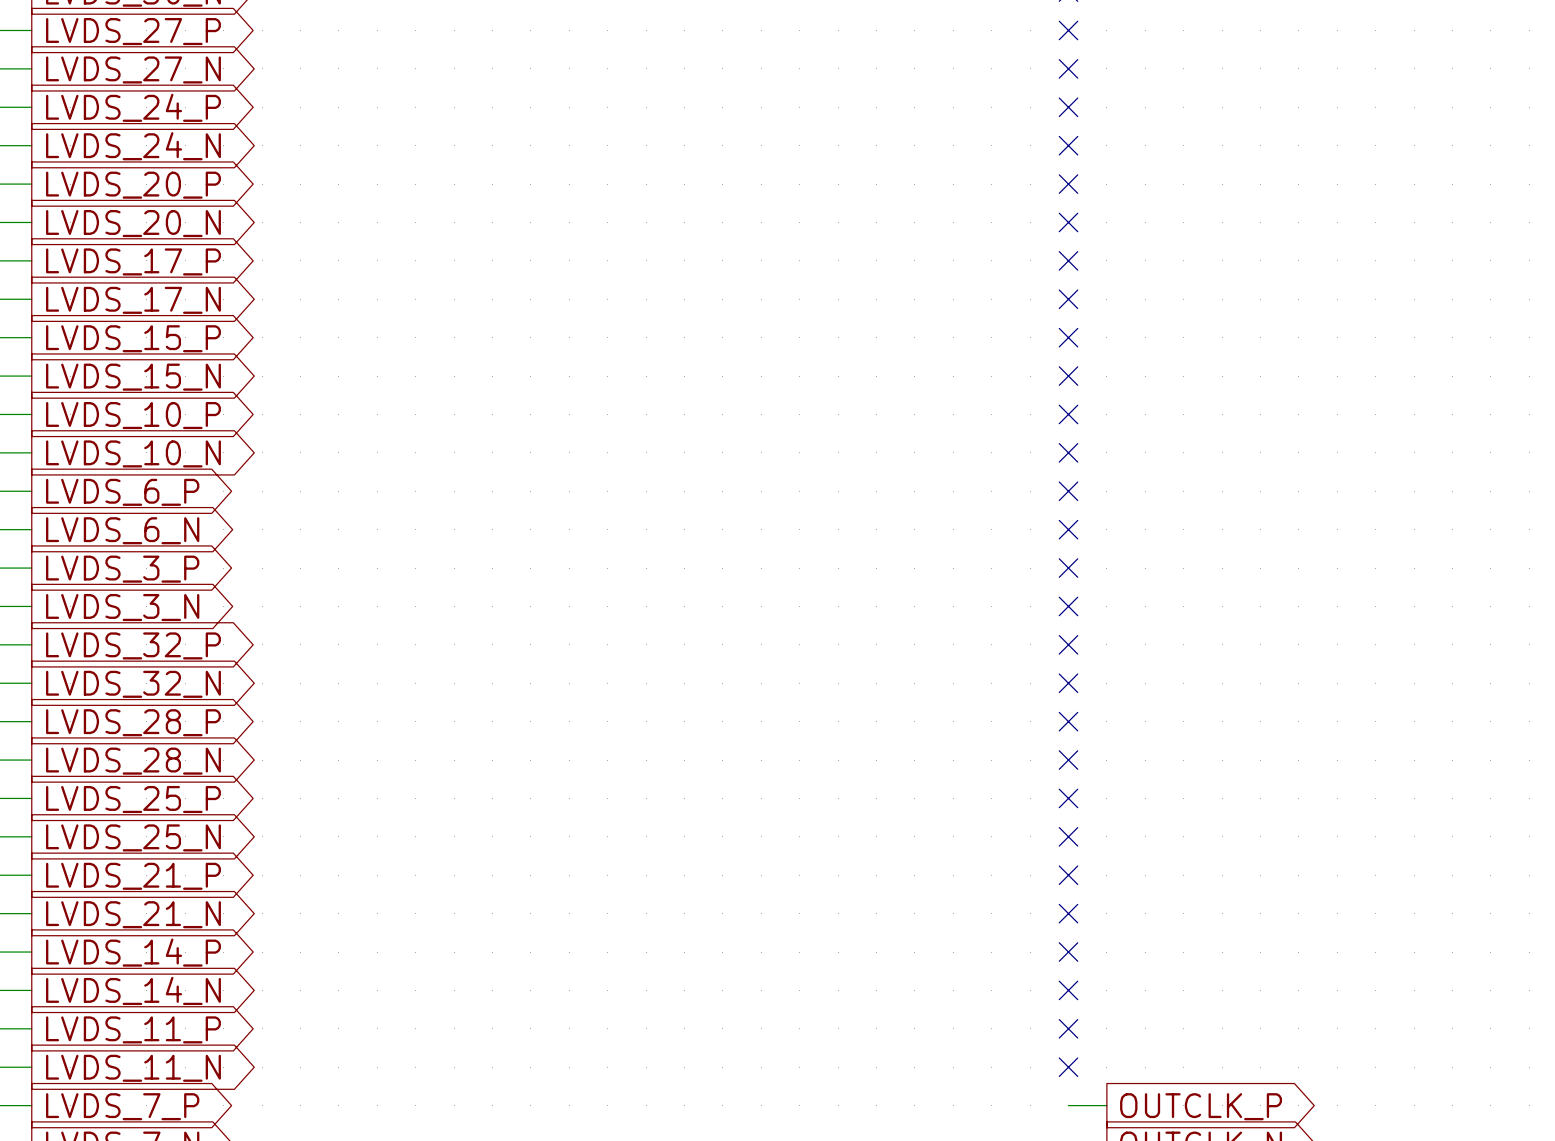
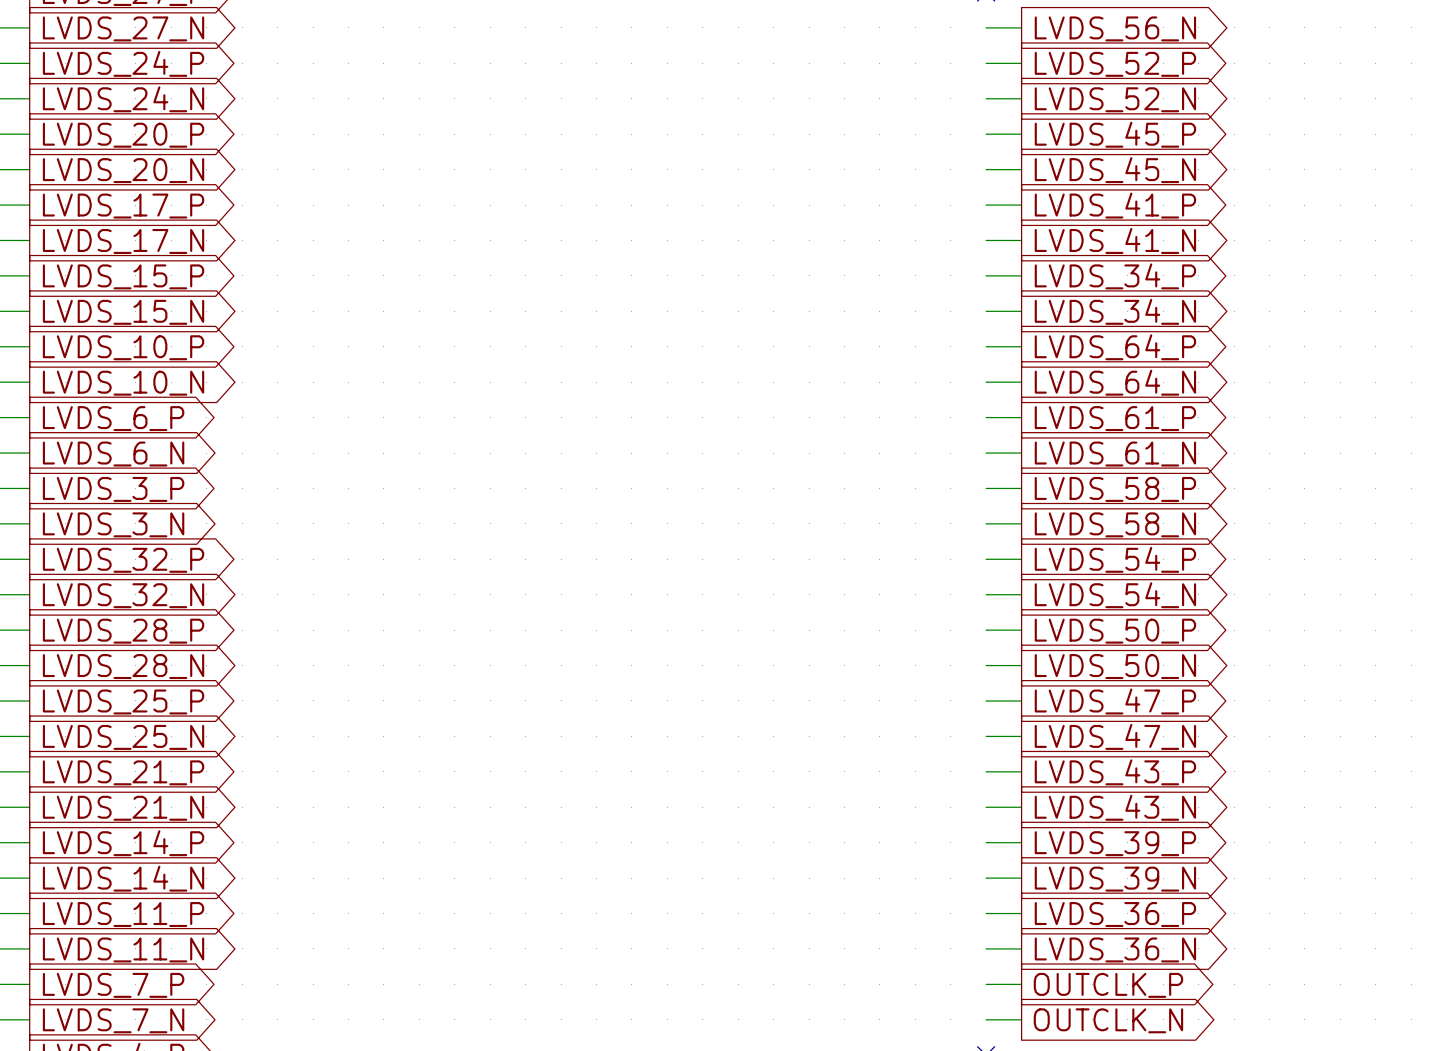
wire: none -> (986, 27) (1021, 27)
no-connect mark: (1068, 68) -> none
global label: none -> LVDS_56_N (1115, 28)
wire: none -> (986, 63) (1021, 63)
no-connect mark: (1068, 107) -> none
global label: none -> LVDS_52_P (1115, 64)
wire: none -> (986, 98) (1021, 98)
no-connect mark: (1068, 145) -> none
global label: none -> LVDS_52_N (1115, 99)
wire: none -> (986, 134) (1021, 134)
no-connect mark: (1068, 184) -> none
global label: none -> LVDS_45_P (1115, 134)
wire: none -> (986, 169) (1021, 169)
no-connect mark: (1068, 222) -> none
global label: none -> LVDS_45_N (1115, 170)
wire: none -> (986, 205) (1021, 205)
no-connect mark: (1068, 260) -> none
global label: none -> LVDS_41_P (1115, 205)
wire: none -> (986, 240) (1021, 240)
no-connect mark: (1068, 299) -> none
global label: none -> LVDS_41_N (1115, 240)
wire: none -> (986, 275) (1021, 275)
no-connect mark: (1068, 337) -> none
global label: none -> LVDS_34_P (1115, 276)
wire: none -> (986, 311) (1021, 311)
no-connect mark: (1068, 376) -> none
global label: none -> LVDS_34_N (1115, 311)
wire: none -> (986, 346) (1021, 346)
no-connect mark: (1068, 414) -> none
global label: none -> LVDS_64_P (1115, 347)
wire: none -> (986, 382) (1021, 382)
no-connect mark: (1068, 452) -> none
global label: none -> LVDS_64_N (1115, 382)
wire: none -> (986, 417) (1021, 417)
no-connect mark: (1068, 491) -> none
global label: none -> LVDS_61_P (1115, 418)
wire: none -> (986, 453) (1021, 453)
no-connect mark: (1068, 529) -> none
global label: none -> LVDS_61_N (1115, 454)
wire: none -> (986, 488) (1021, 488)
no-connect mark: (1068, 568) -> none
global label: none -> LVDS_58_P (1115, 489)
wire: none -> (986, 523) (1021, 523)
no-connect mark: (1068, 606) -> none
global label: none -> LVDS_58_N (1115, 524)
wire: none -> (986, 559) (1021, 559)
no-connect mark: (1068, 644) -> none
global label: none -> LVDS_54_P (1115, 559)
wire: none -> (986, 594) (1021, 594)
no-connect mark: (1068, 683) -> none
global label: none -> LVDS_54_N (1115, 595)
wire: none -> (986, 630) (1021, 630)
no-connect mark: (1068, 721) -> none
global label: none -> LVDS_50_P (1115, 631)
wire: none -> (986, 665) (1021, 665)
no-connect mark: (1068, 760) -> none
global label: none -> LVDS_50_N (1115, 666)
wire: none -> (986, 700) (1021, 700)
no-connect mark: (1068, 798) -> none
global label: none -> LVDS_47_P (1115, 701)
wire: none -> (986, 736) (1021, 736)
no-connect mark: (1068, 836) -> none
global label: none -> LVDS_47_N (1115, 736)
wire: none -> (986, 771) (1021, 771)
no-connect mark: (1068, 875) -> none
global label: none -> LVDS_43_P (1115, 772)
wire: none -> (986, 807) (1021, 807)
no-connect mark: (1068, 913) -> none
global label: none -> LVDS_43_N (1115, 807)
wire: none -> (986, 842) (1021, 842)
no-connect mark: (1068, 952) -> none
global label: none -> LVDS_39_P (1115, 843)
wire: none -> (986, 878) (1021, 878)
no-connect mark: (1068, 990) -> none
global label: none -> LVDS_39_N (1115, 879)
wire: none -> (986, 913) (1021, 913)
no-connect mark: (1068, 1028) -> none
global label: none -> LVDS_36_P (1115, 914)
wire: none -> (986, 948) (1021, 948)
no-connect mark: (1068, 1067) -> none
global label: none -> LVDS_36_N (1115, 949)

